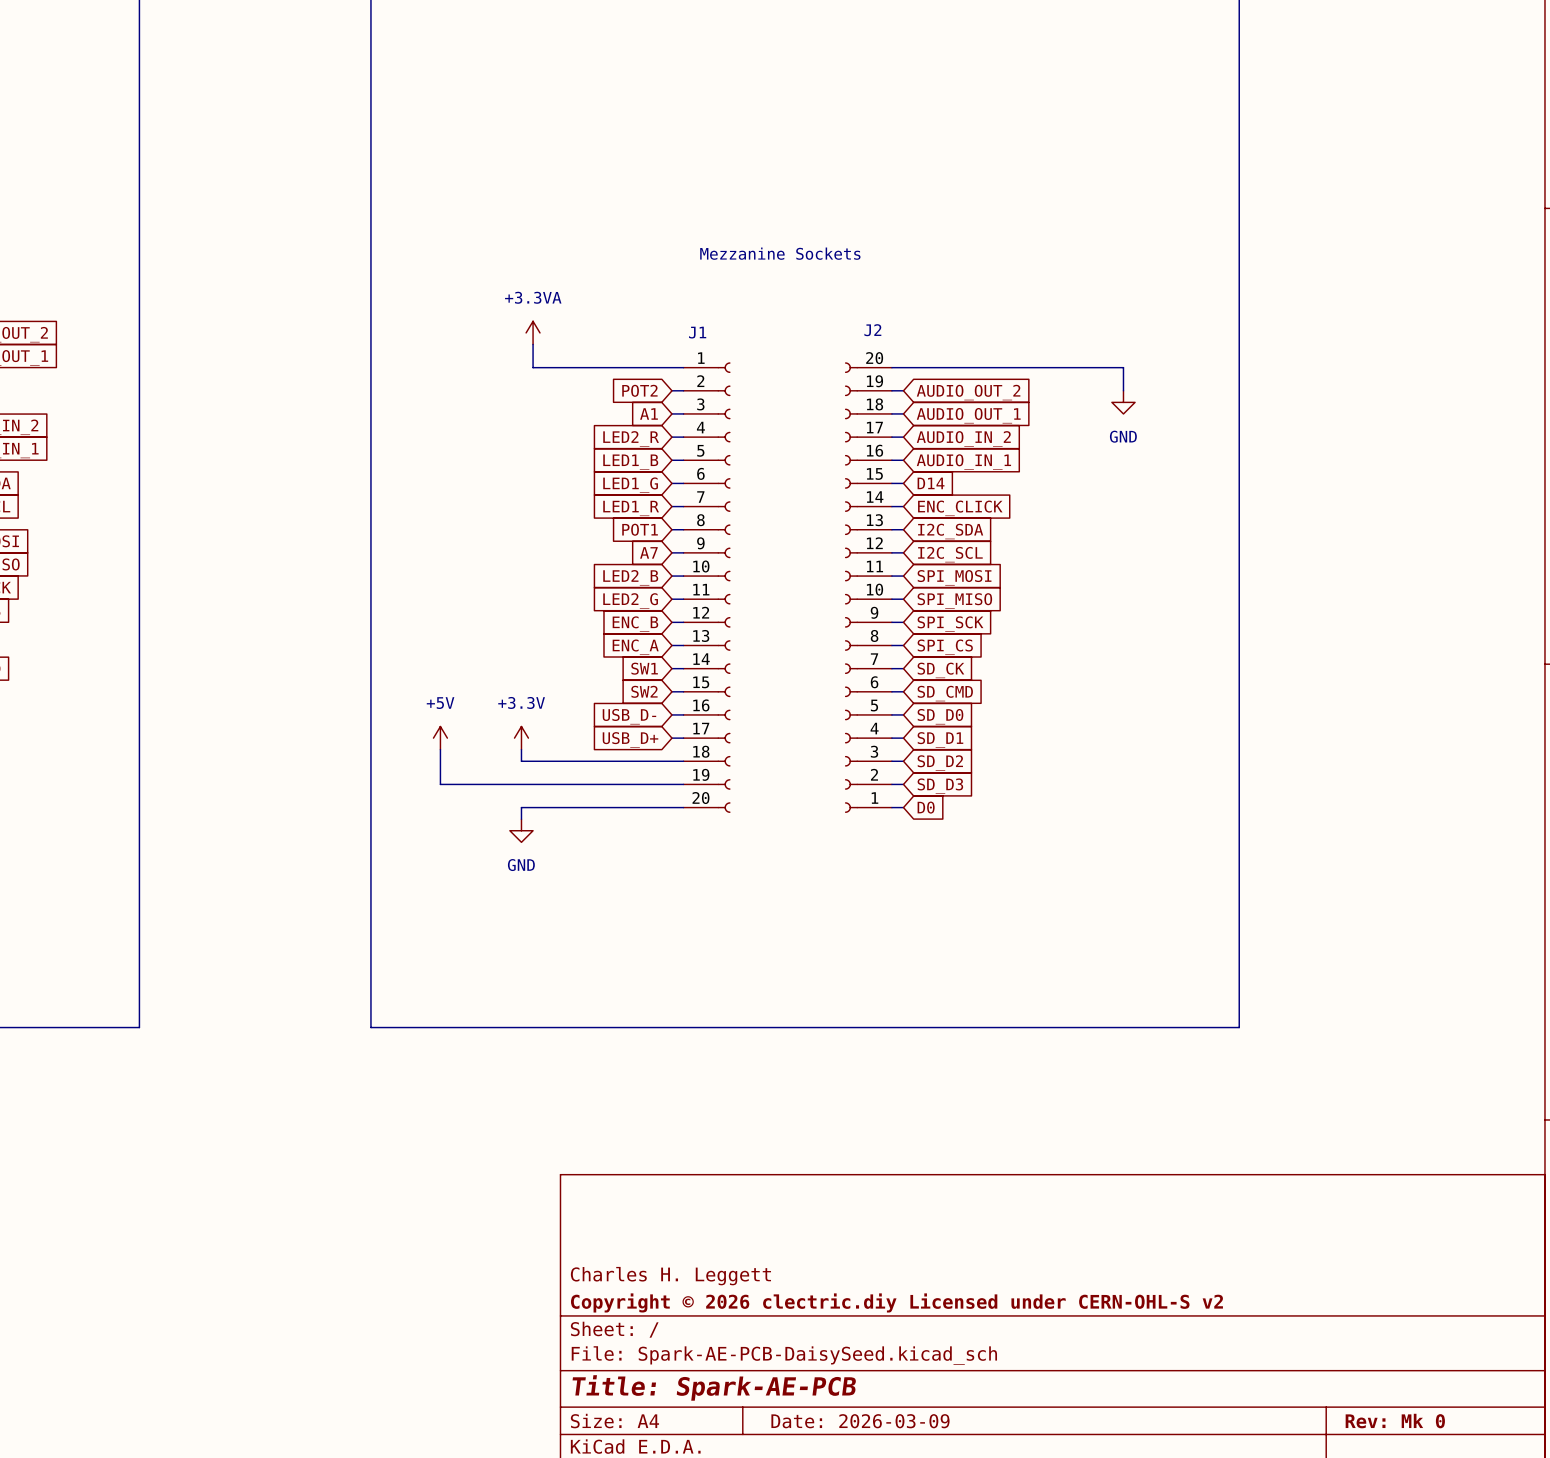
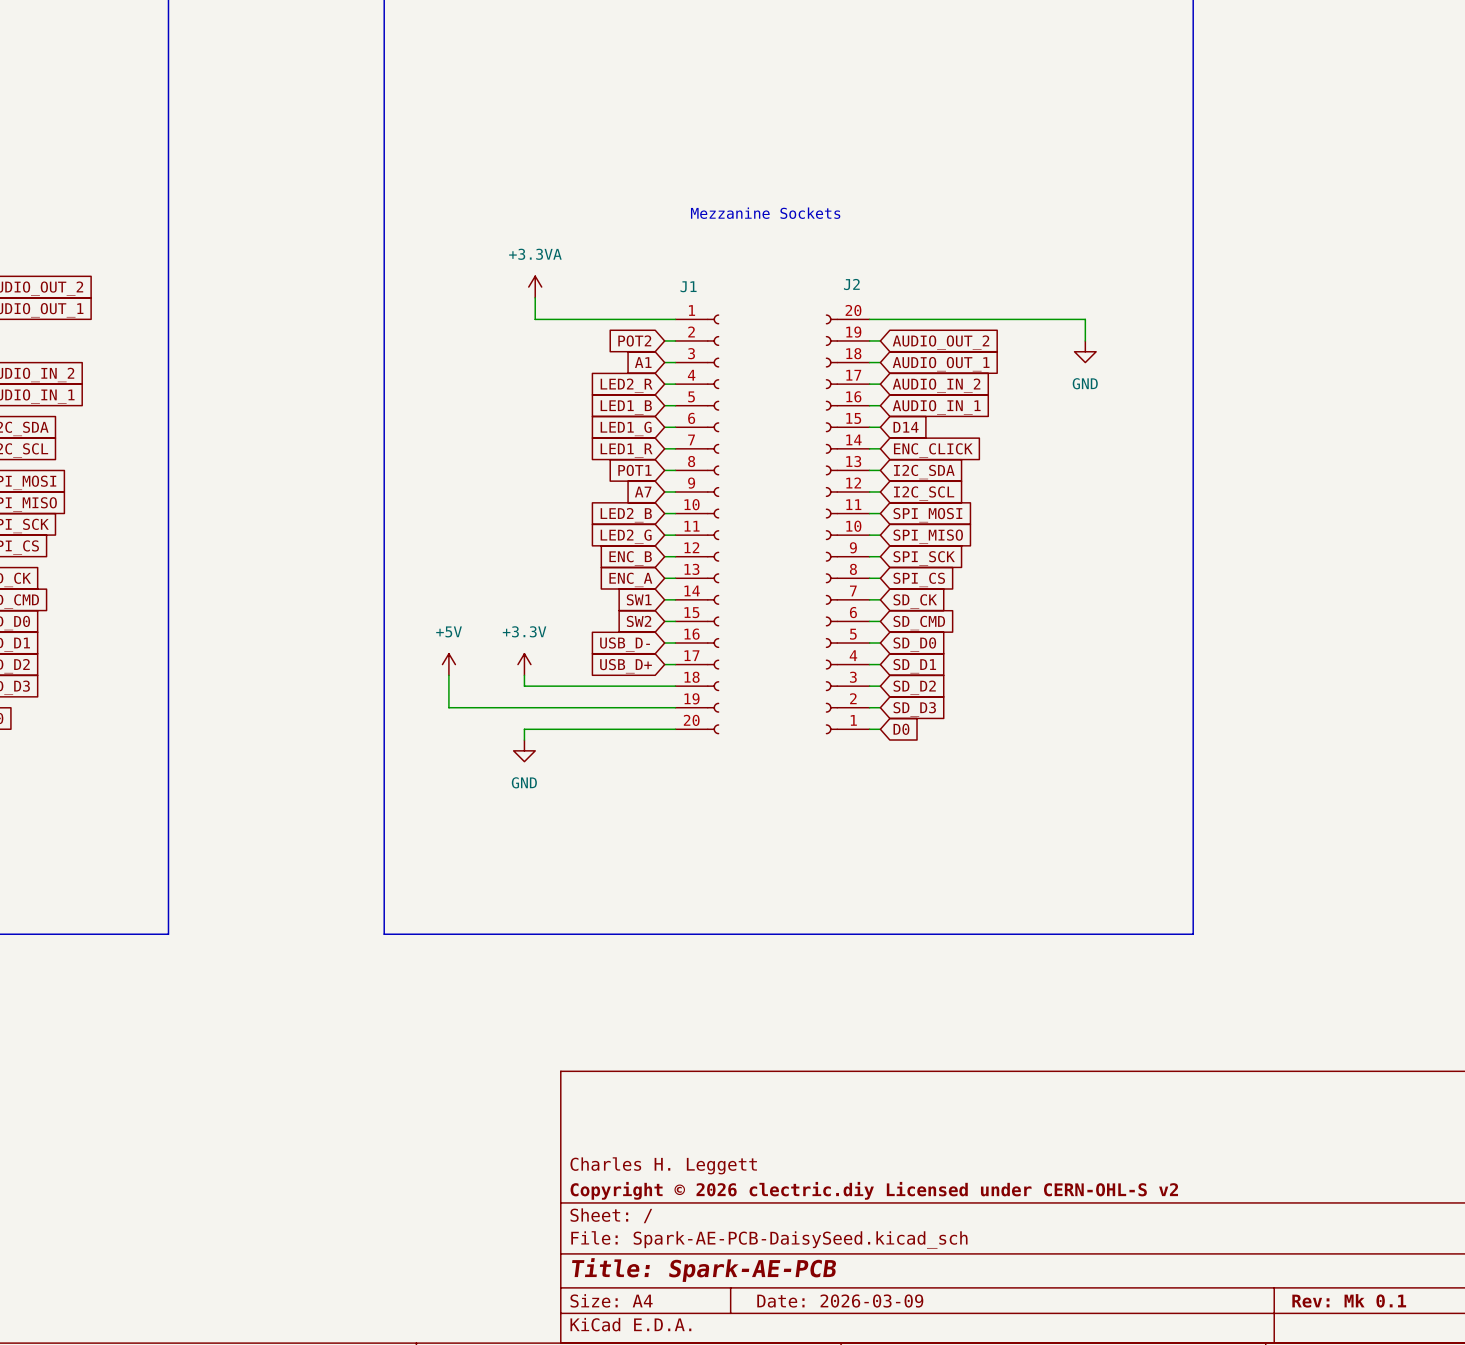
title block: Rev: Mk 0 (1395, 1421) -> Rev: Mk 0.1 (1349, 1300)

